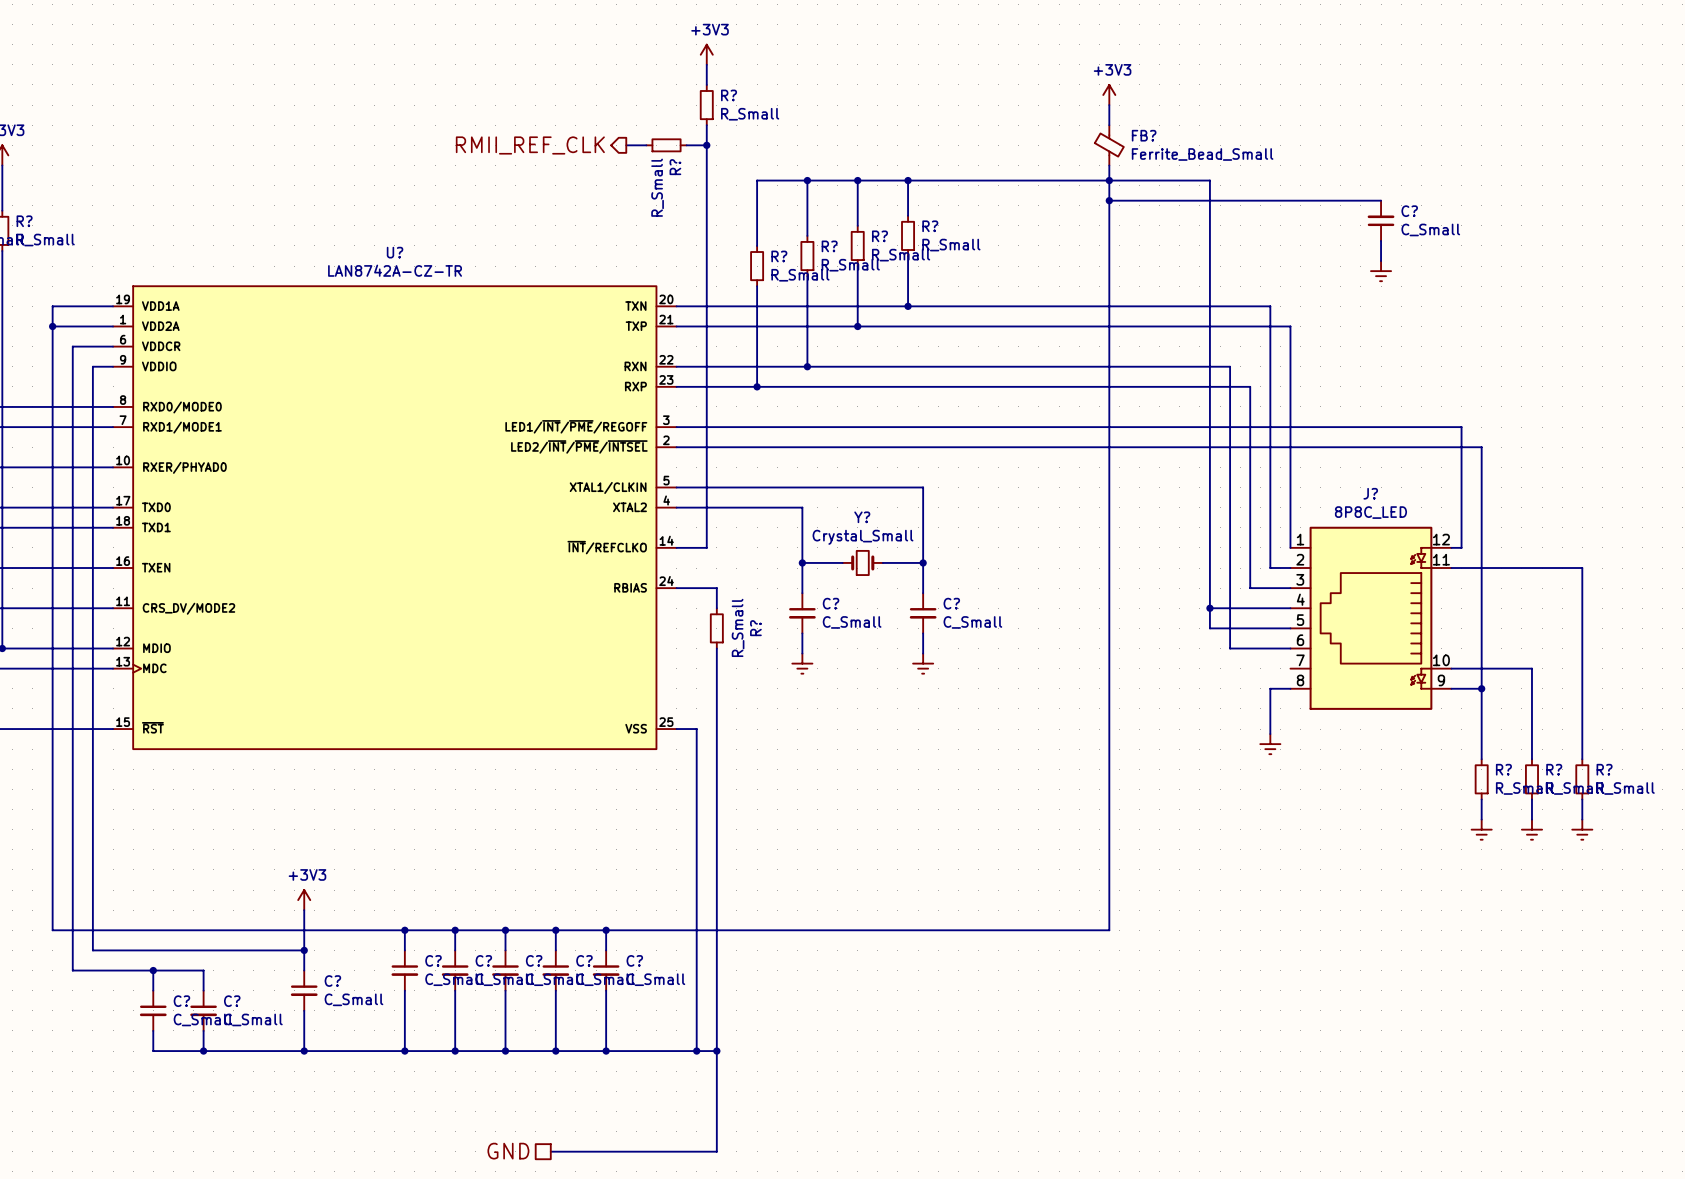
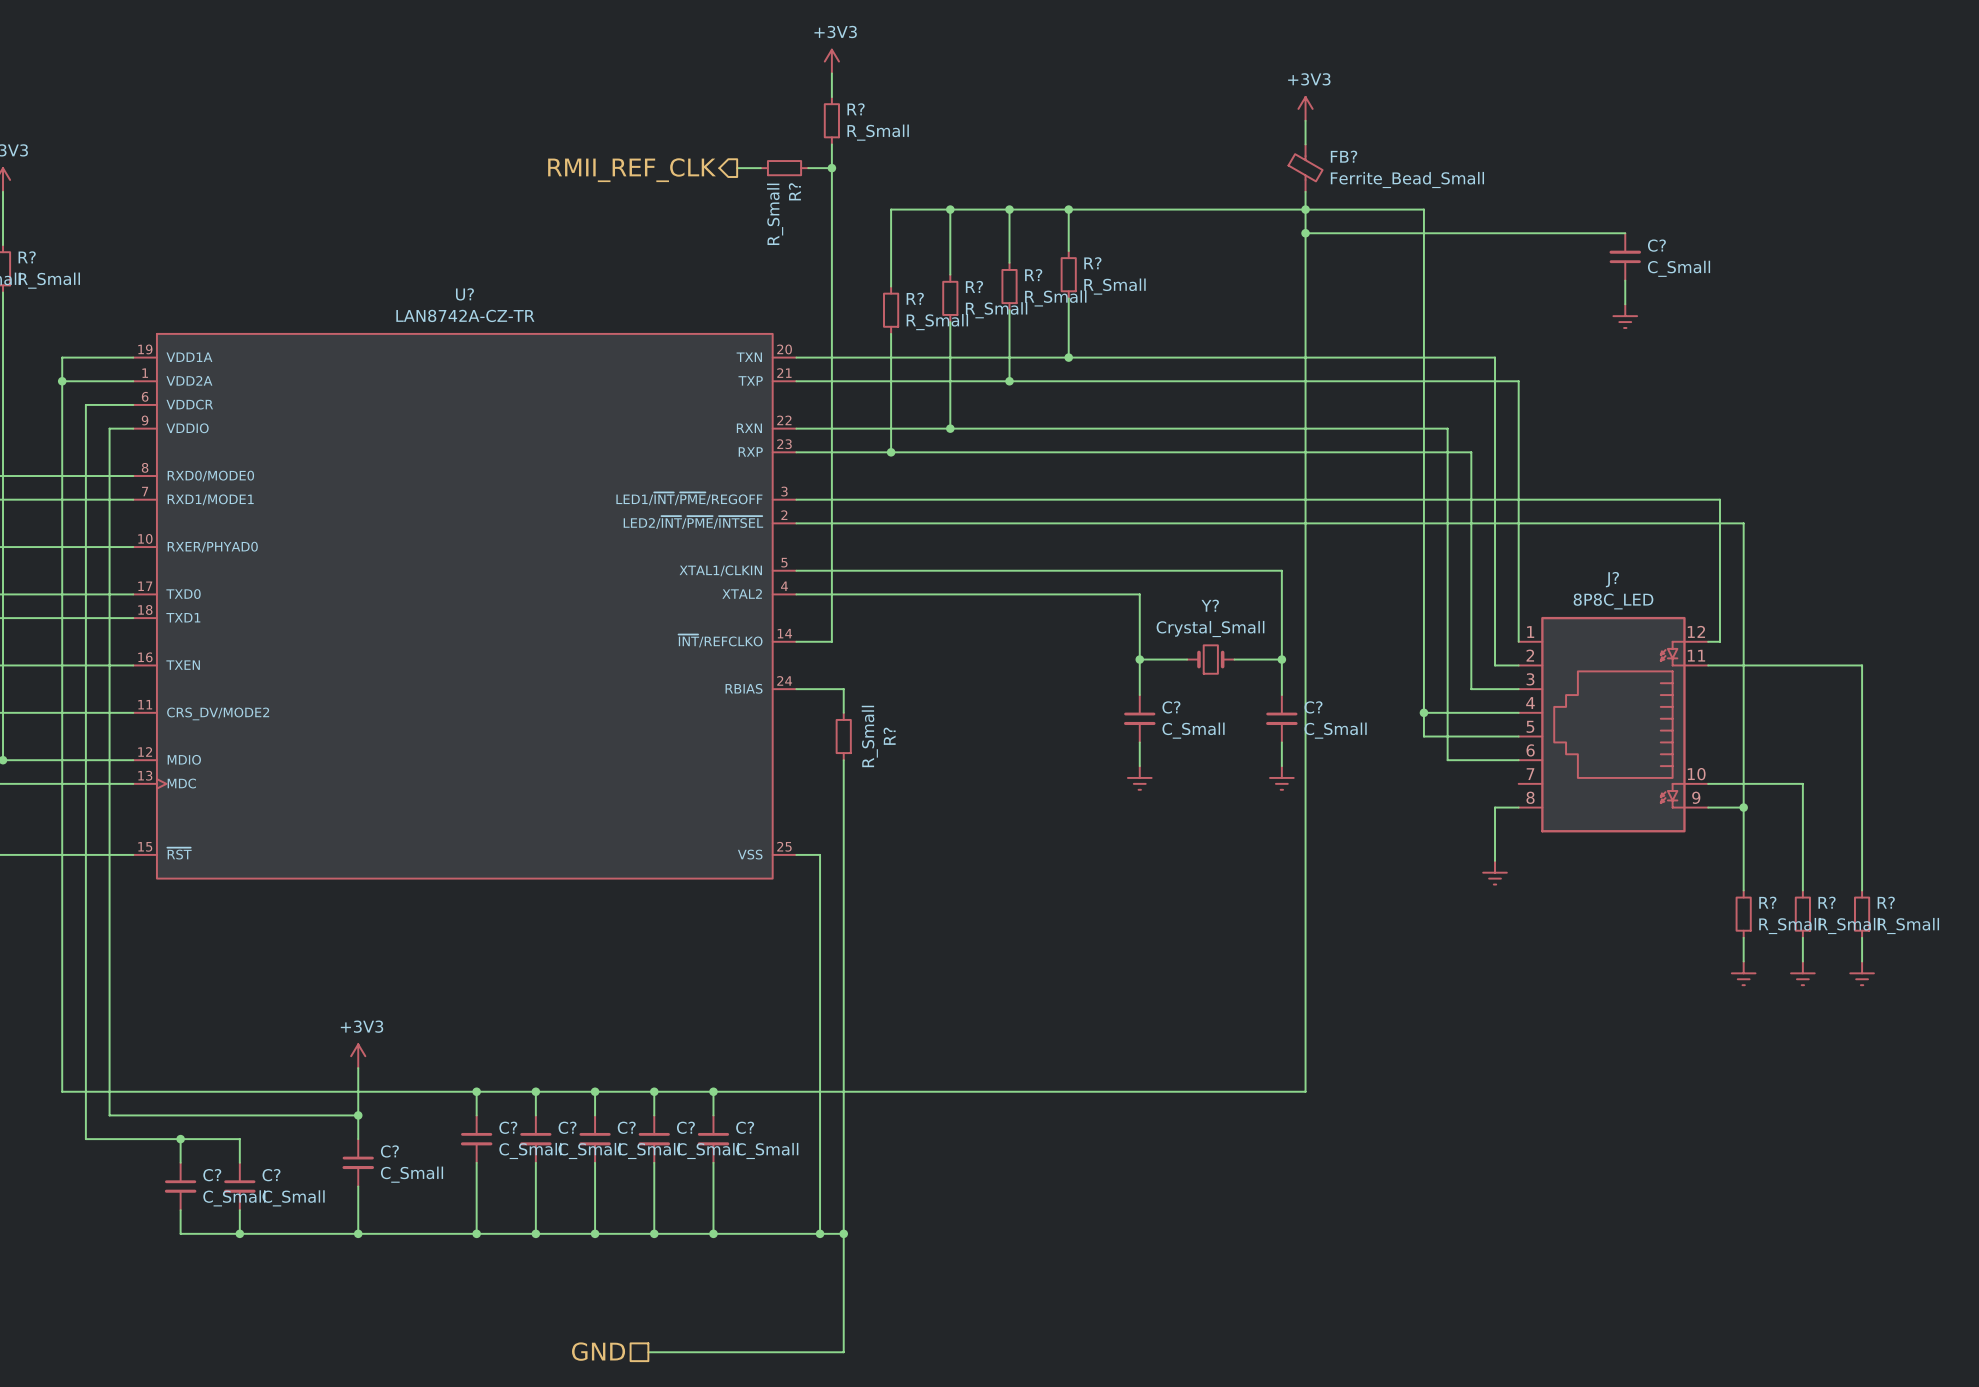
wire: (923, 487) (923, 593) -> (1086, 570) (1281, 570) (1281, 695)
wire: (802, 507) (802, 593) -> (944, 594) (1139, 594) (1139, 695)
wire: (802, 562) (842, 562) -> (1139, 659) (1187, 659)
junction: (802, 562) -> none
Y? position: (862, 562) -> (1210, 659)
wire: (882, 562) (923, 562) -> (1234, 659) (1281, 659)
junction position: (923, 562) -> (1139, 659)
junction: none -> (1281, 659)
C?: C_Small (802, 613) -> none
C? position: (923, 613) -> (1139, 718)
C?: none -> C_Small (1281, 718)
wire: (802, 633) (802, 653) -> (1139, 742) (1139, 766)
wire: (923, 633) (923, 653) -> (1281, 742) (1281, 766)
power symbol: (802, 663) -> none
power symbol position: (923, 663) -> (1139, 777)
power symbol: none -> (1281, 777)

